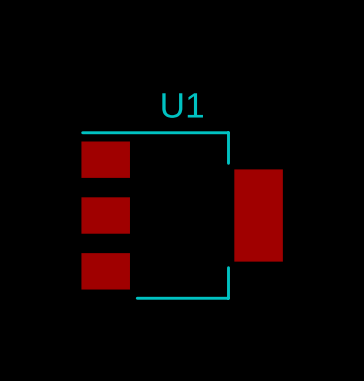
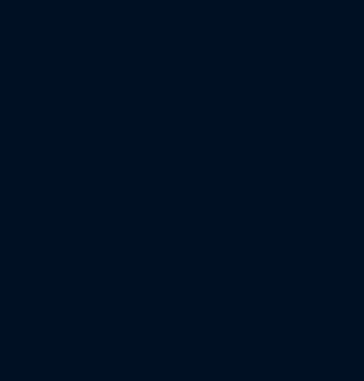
U1: (182, 215) -> none

